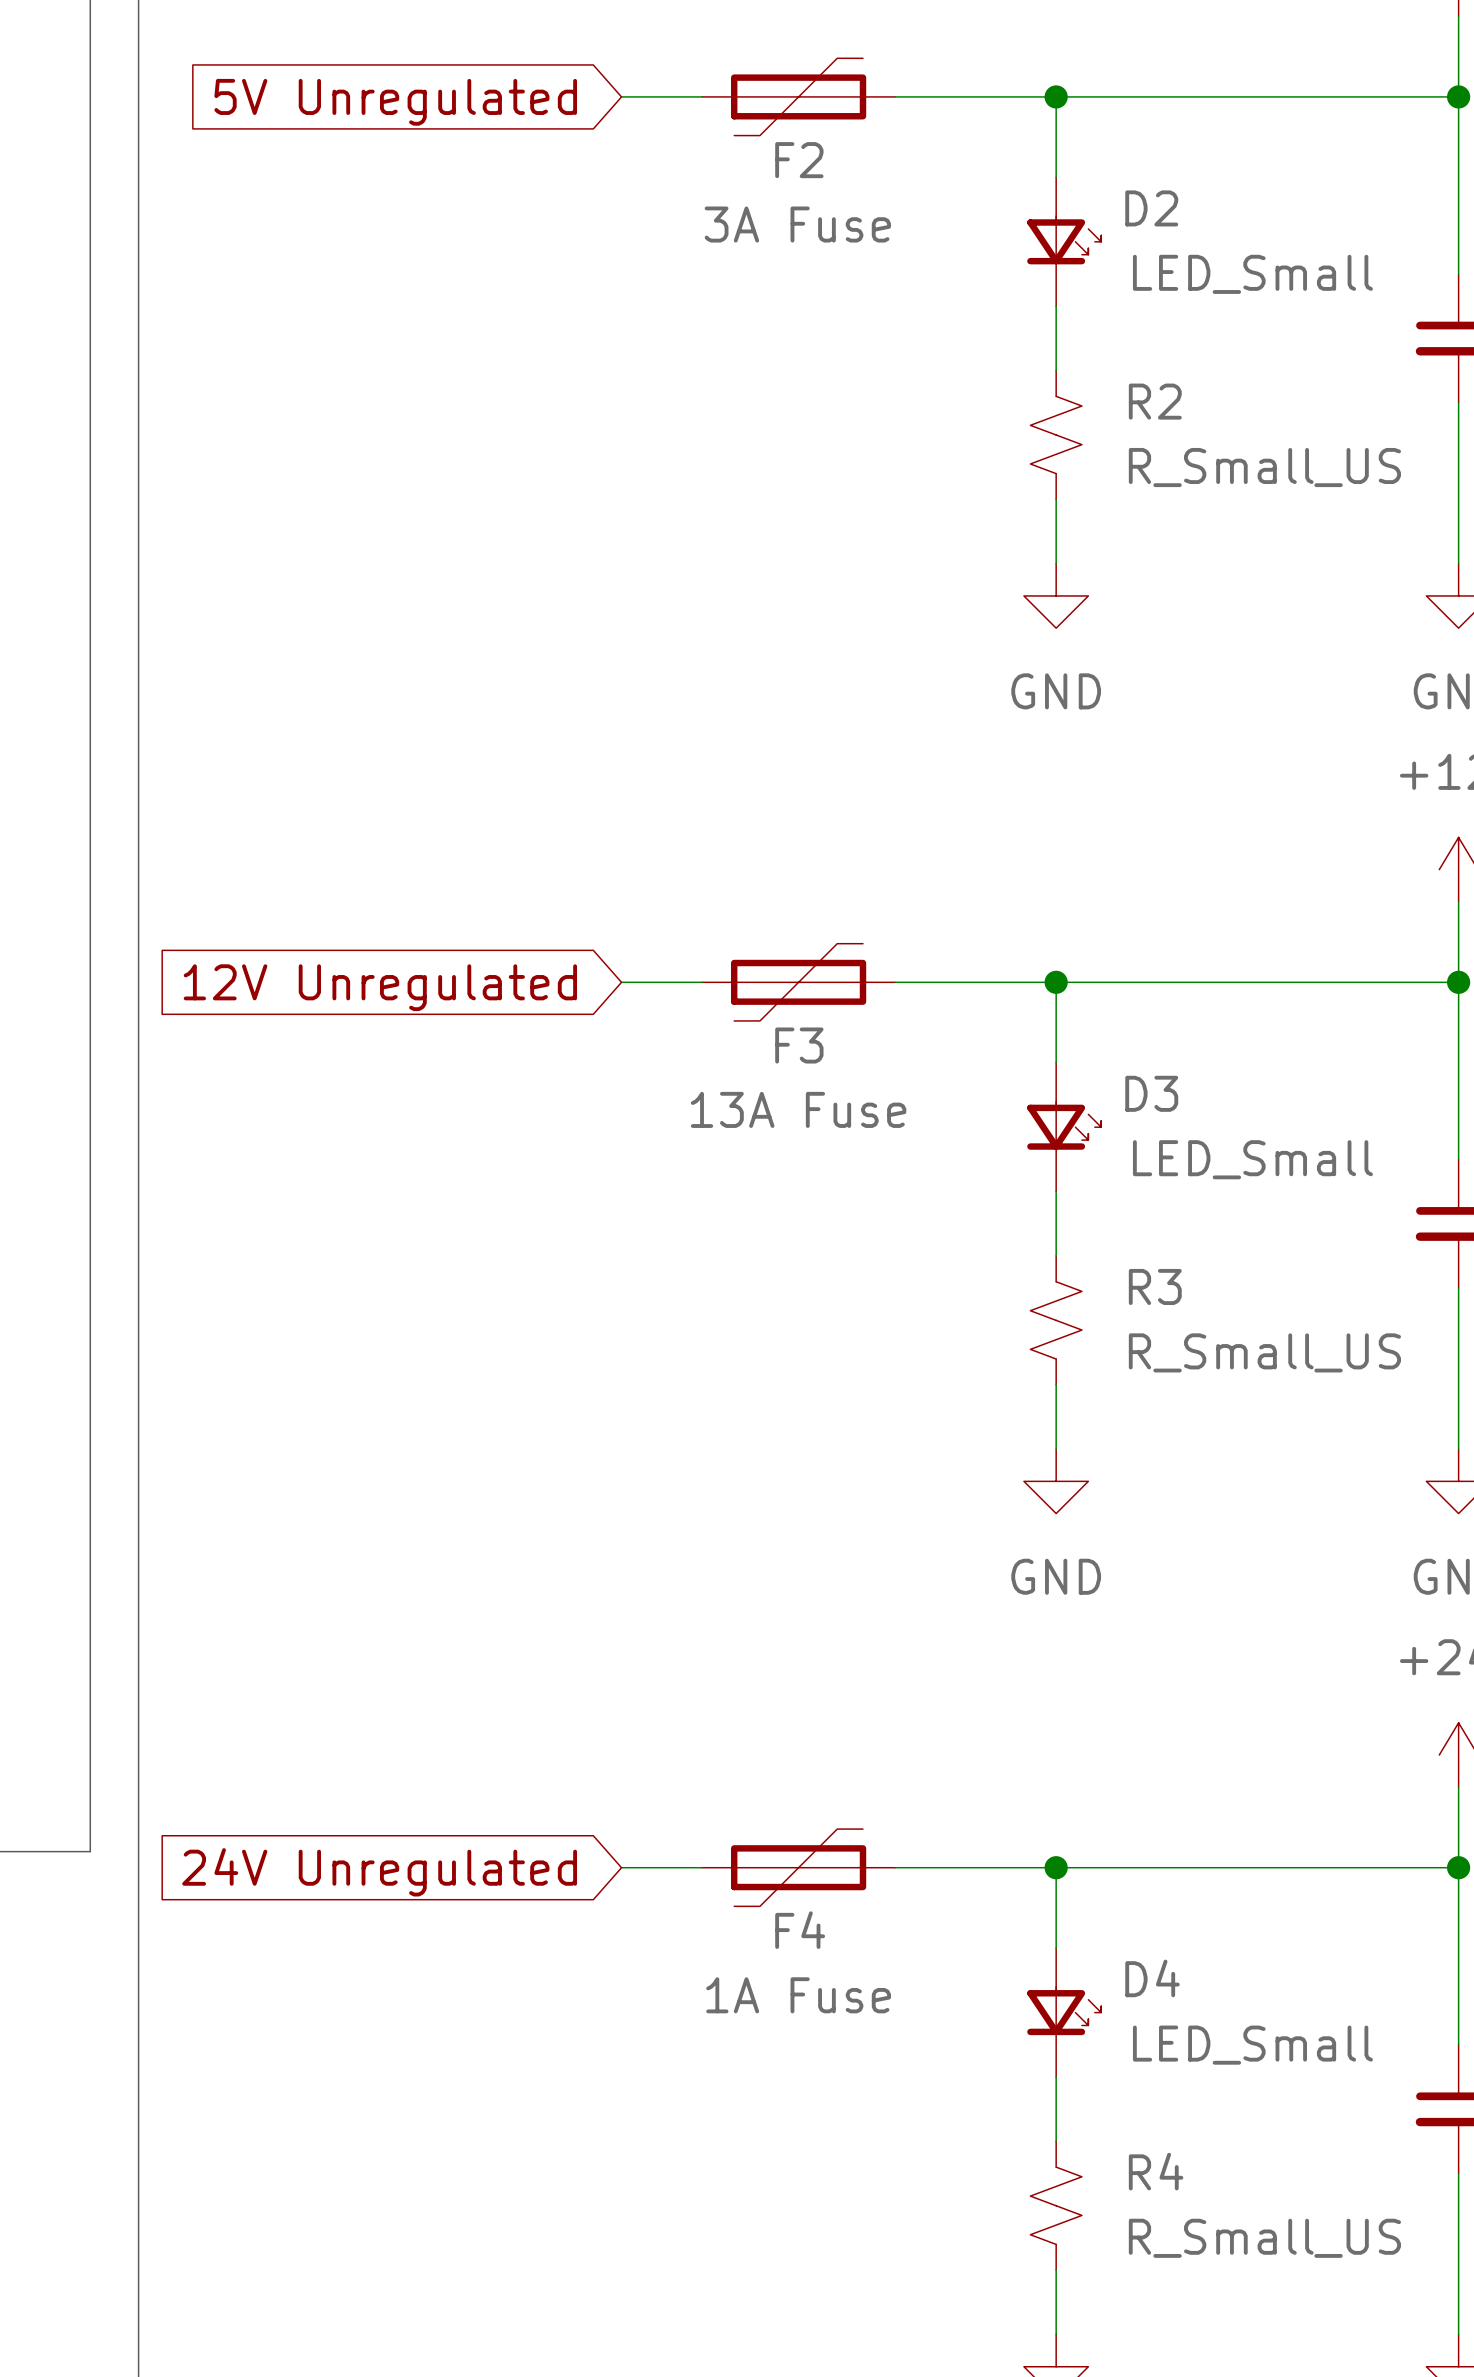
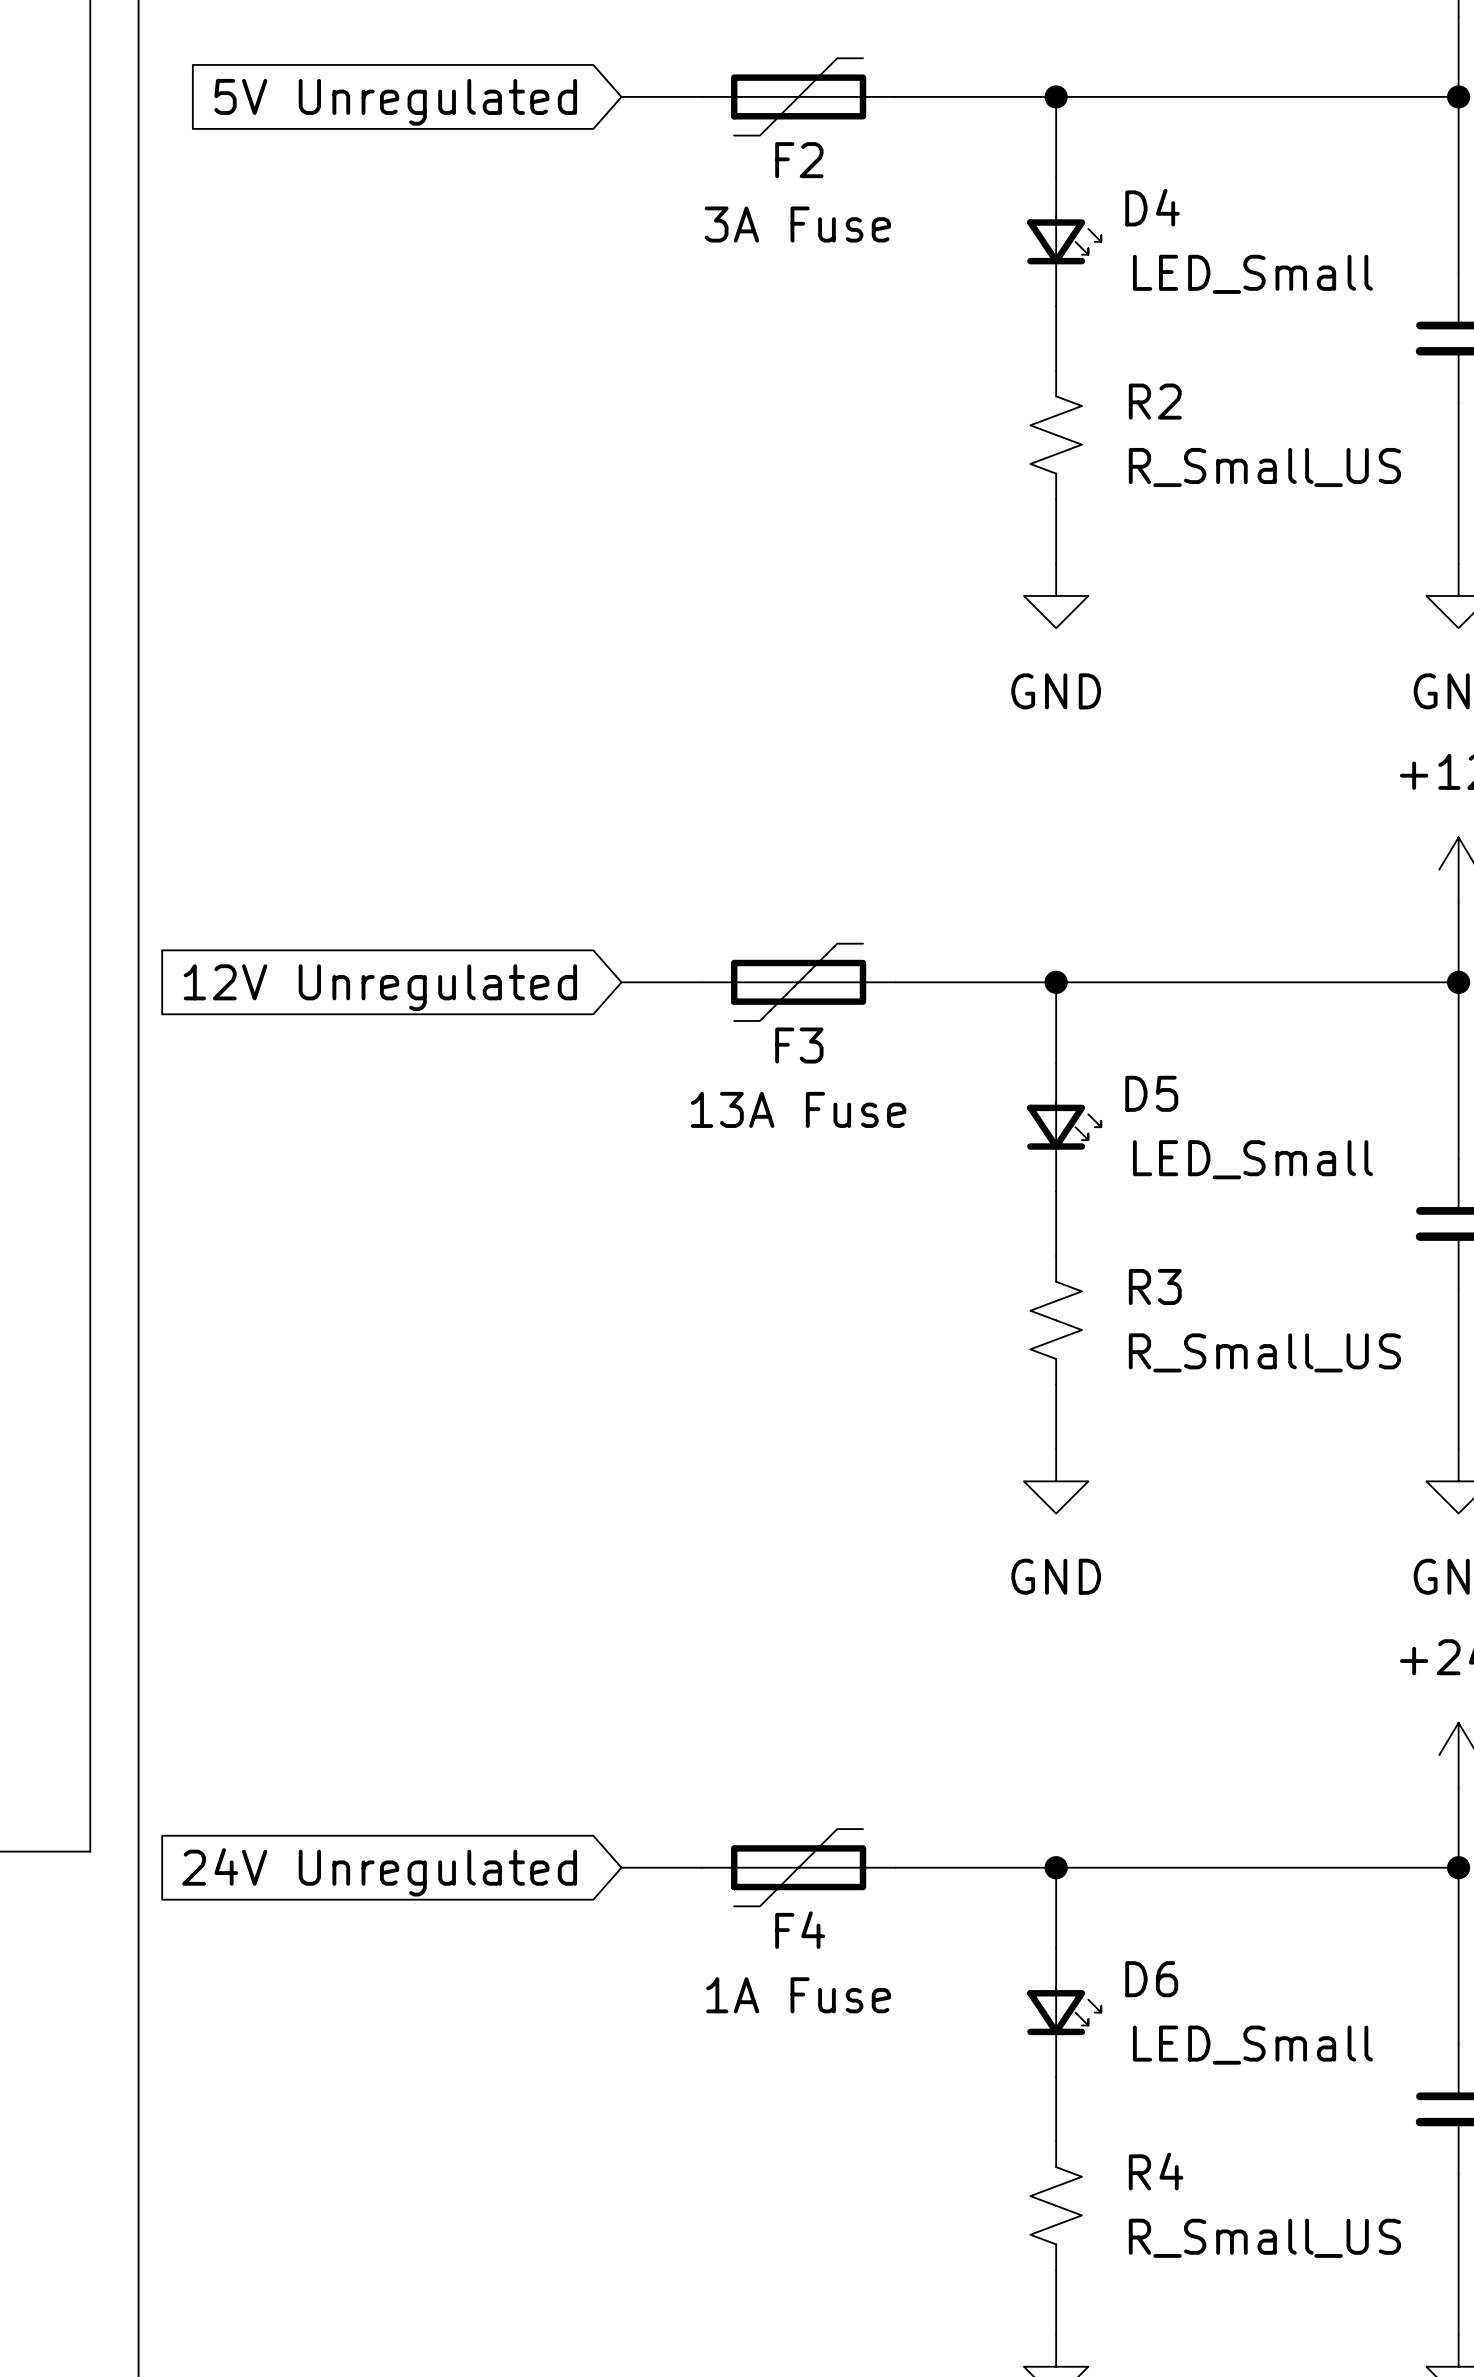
D2 name: D2 (1151, 208) -> D4 (1152, 207)
D3 name: D3 (1151, 1093) -> D5 (1151, 1093)
D4 name: D4 (1152, 1978) -> D6 (1151, 1979)

